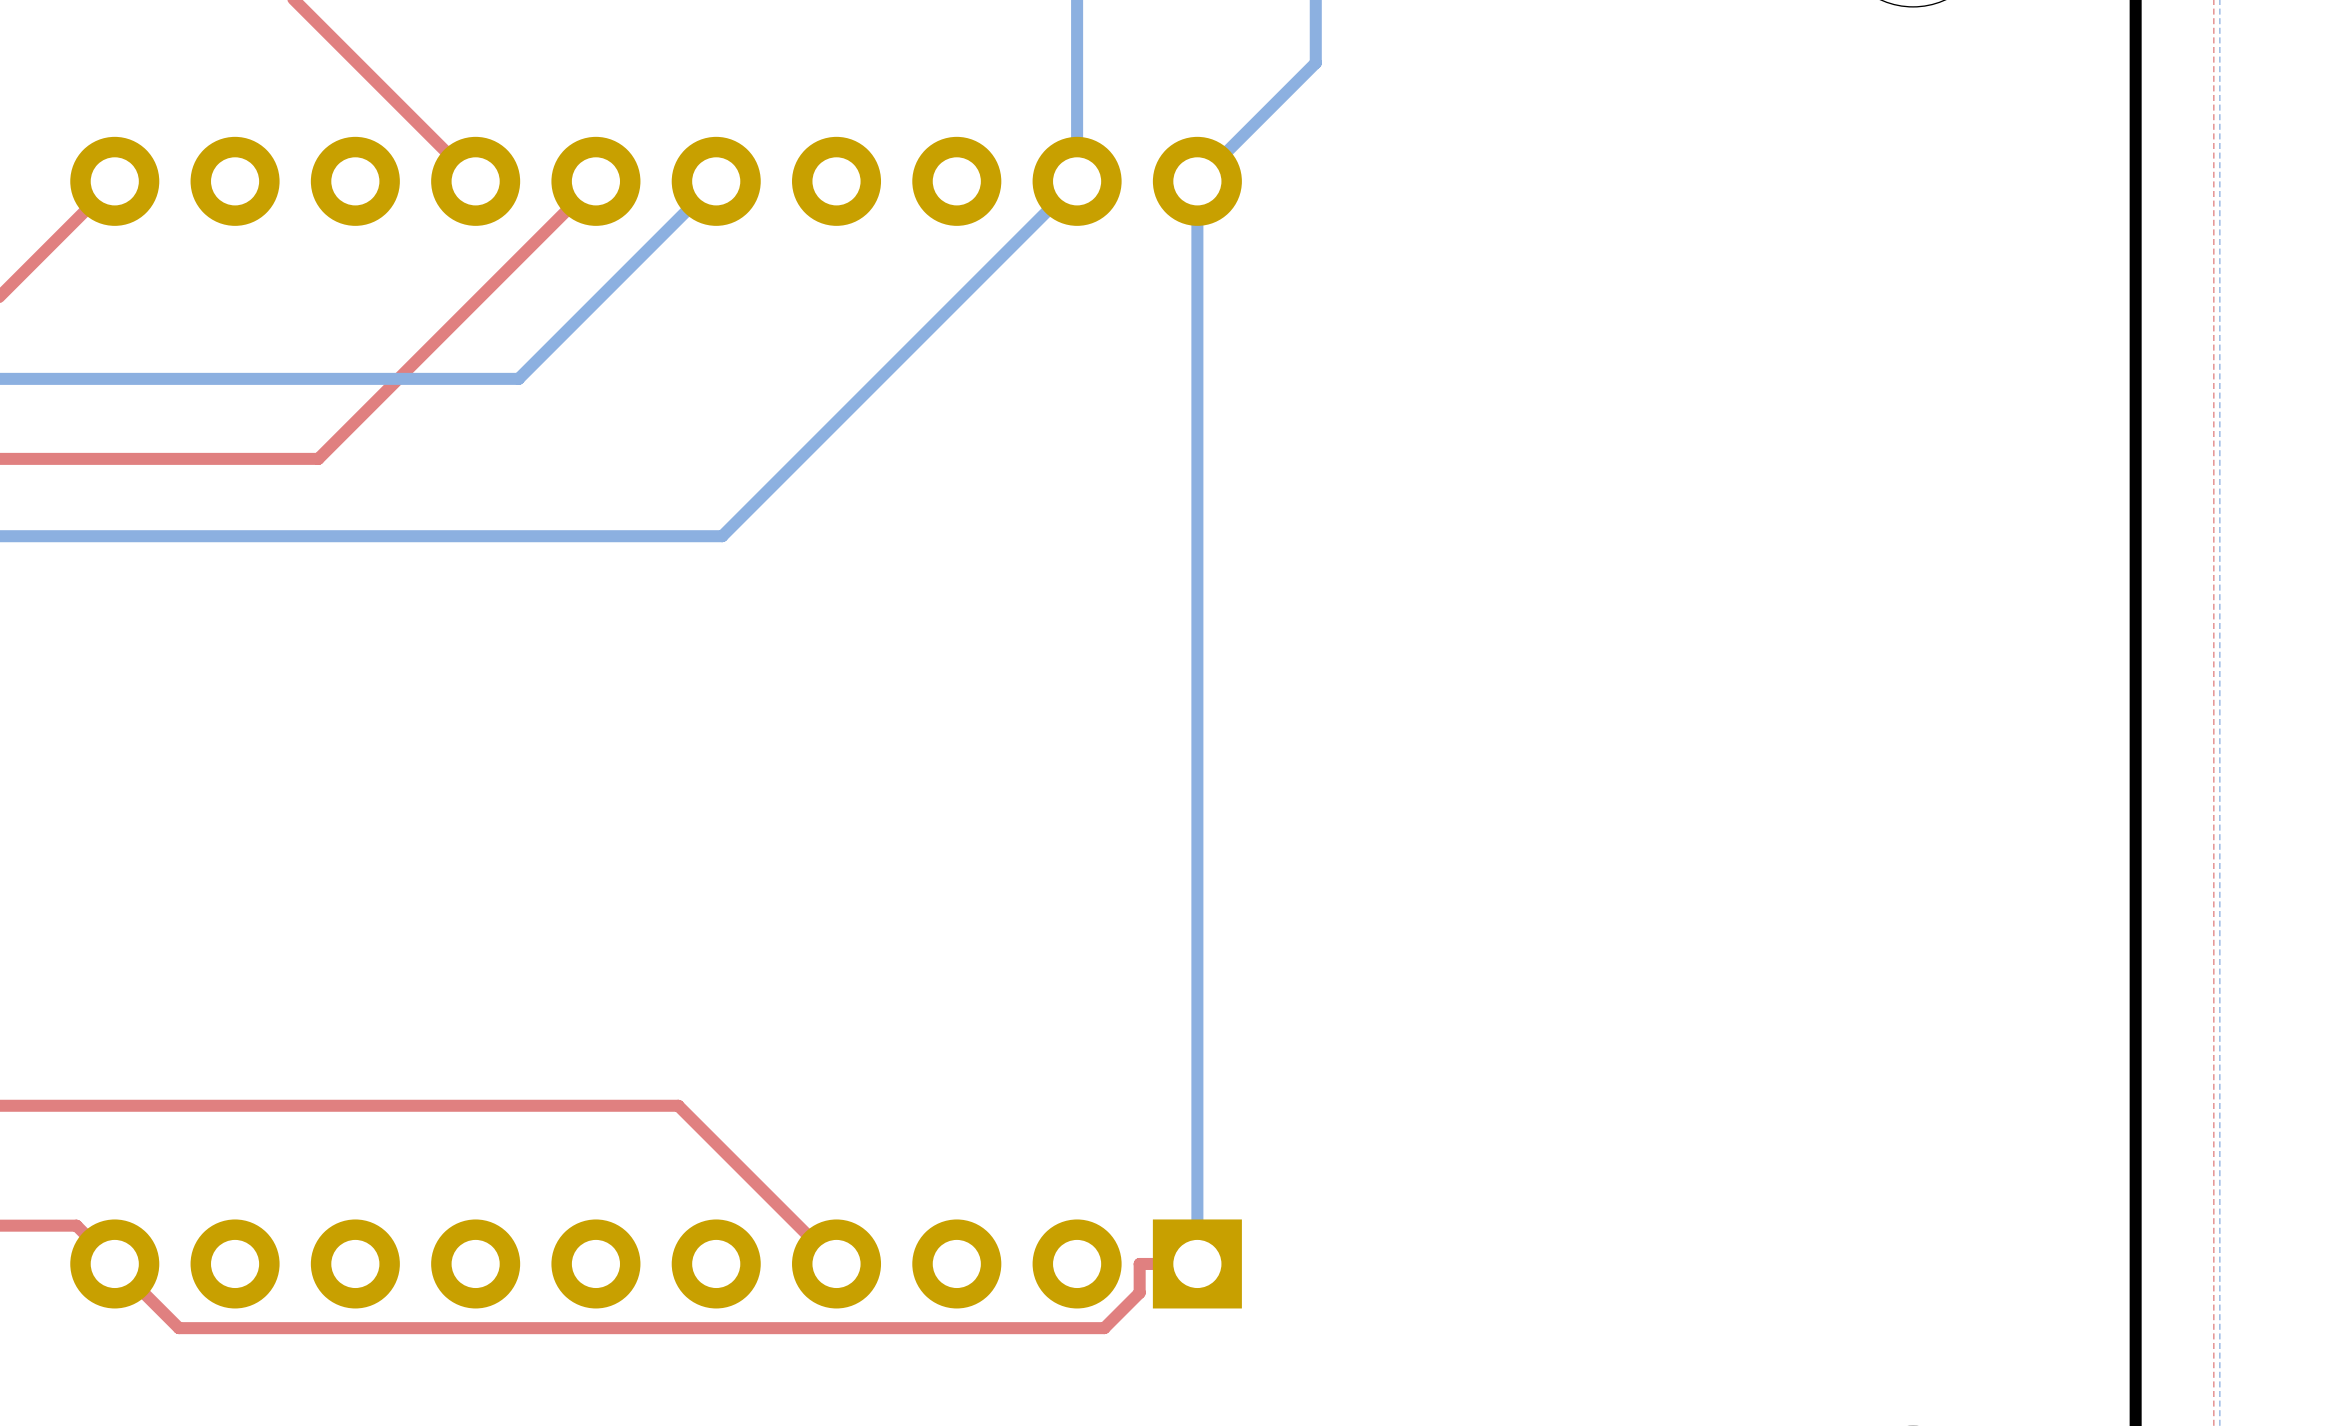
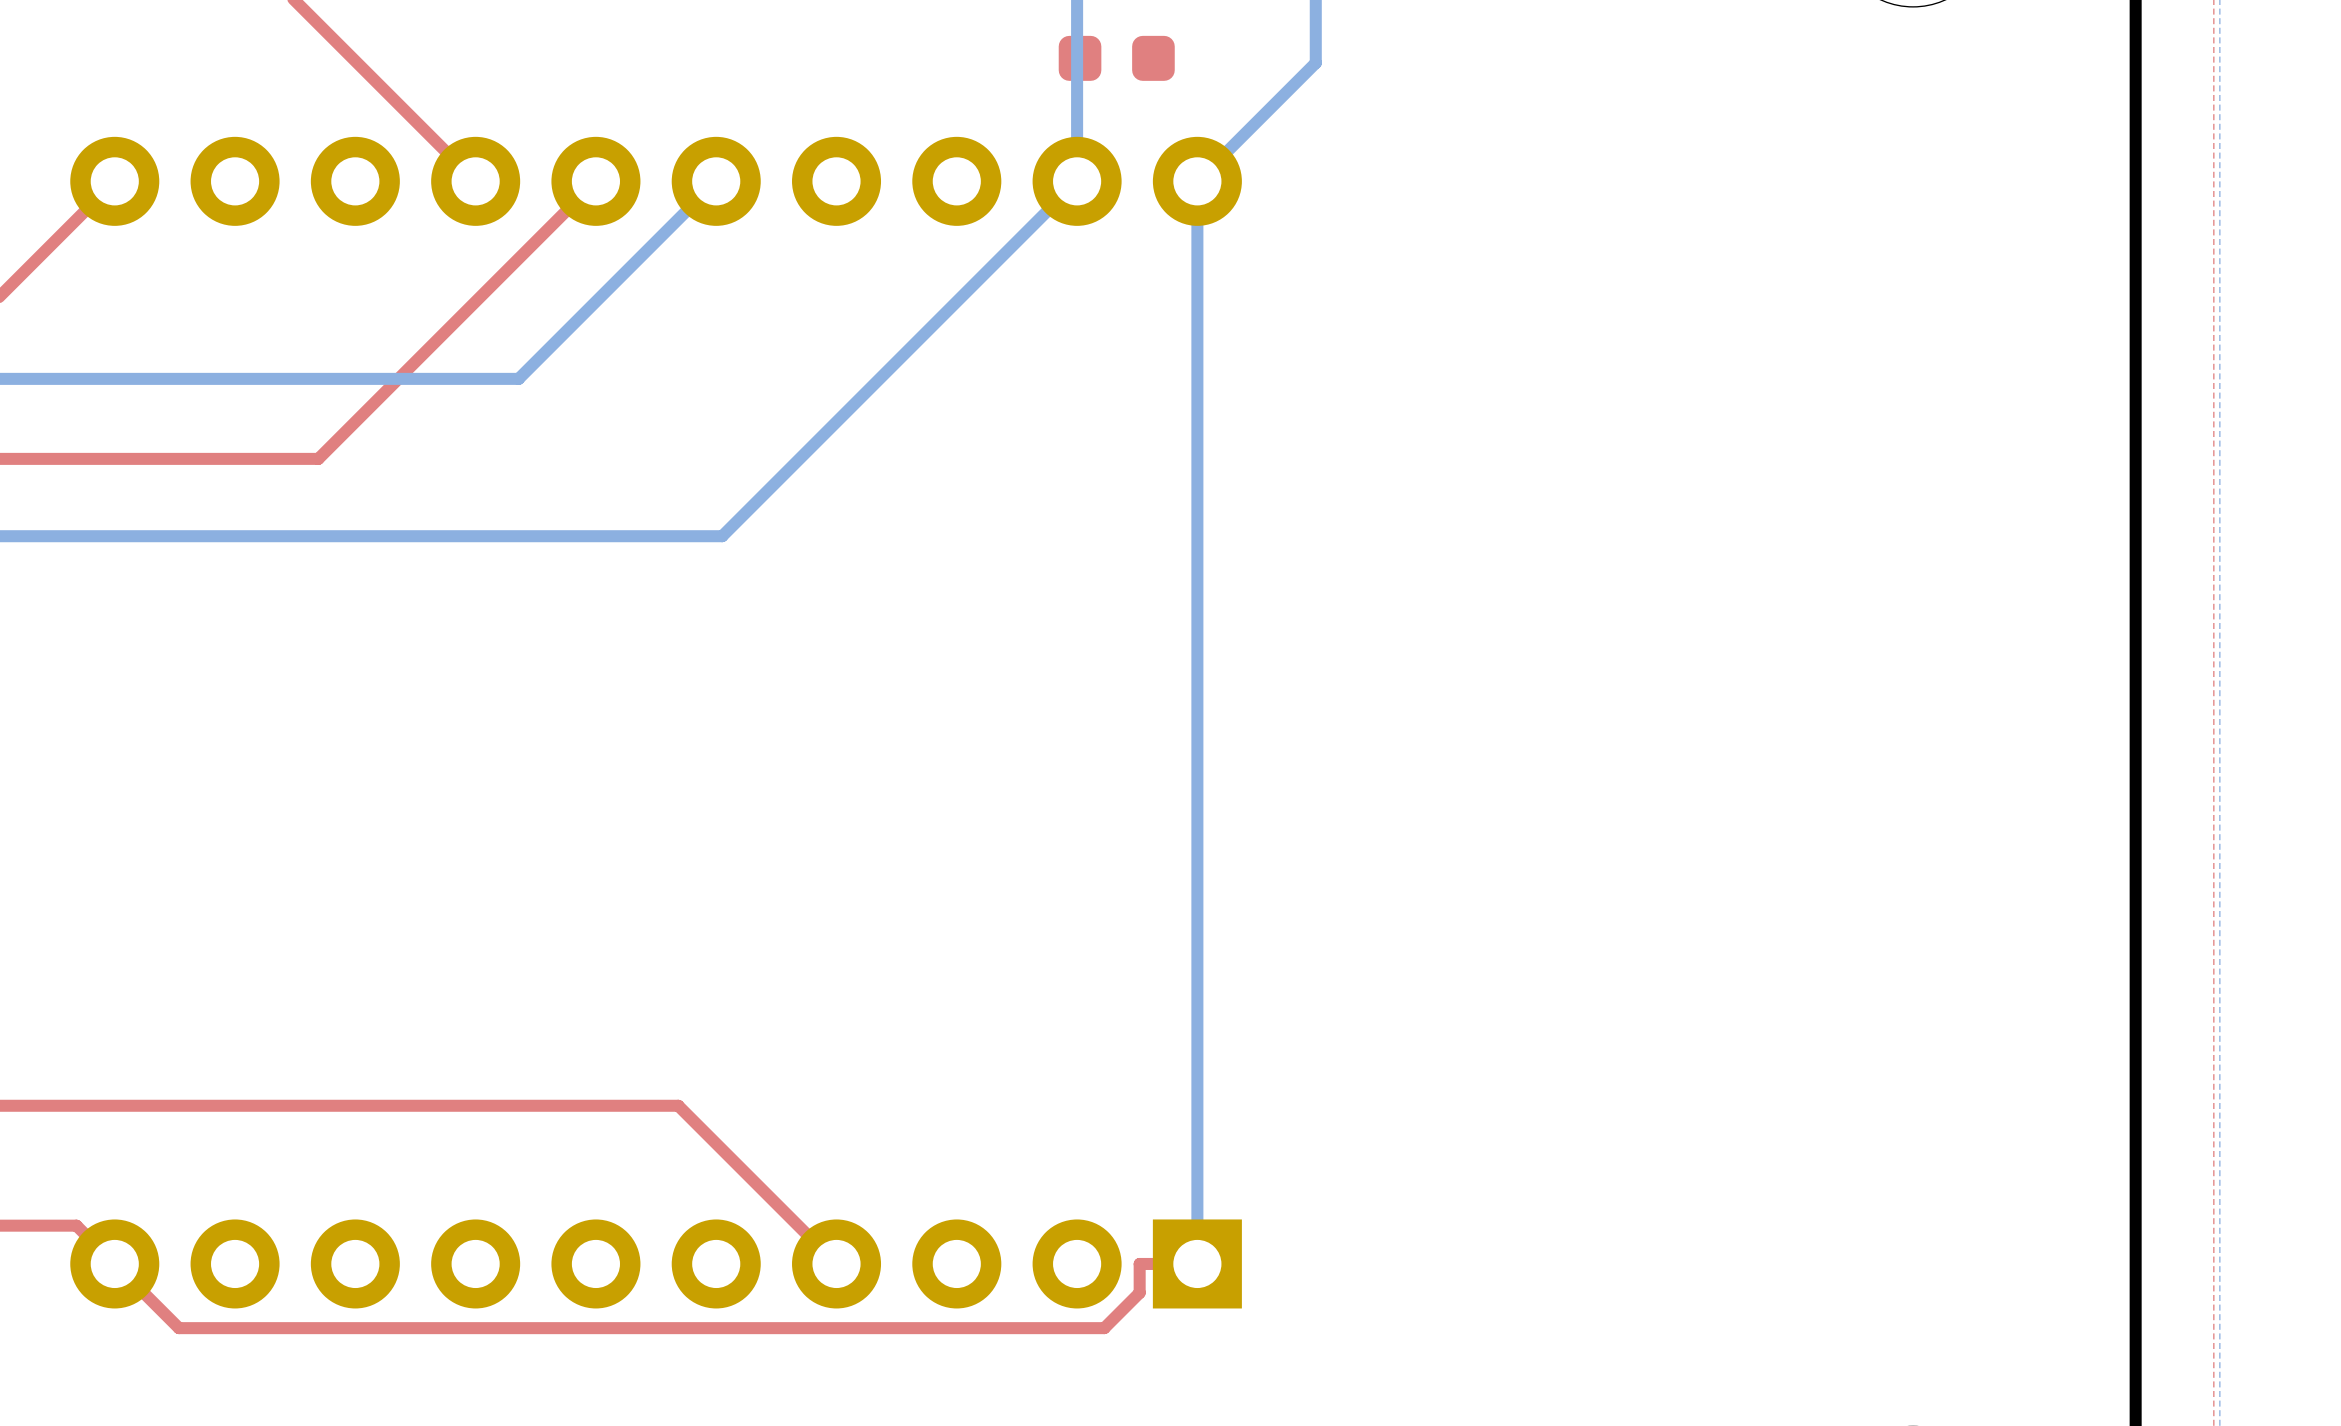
part: none -> (1116, 58)

